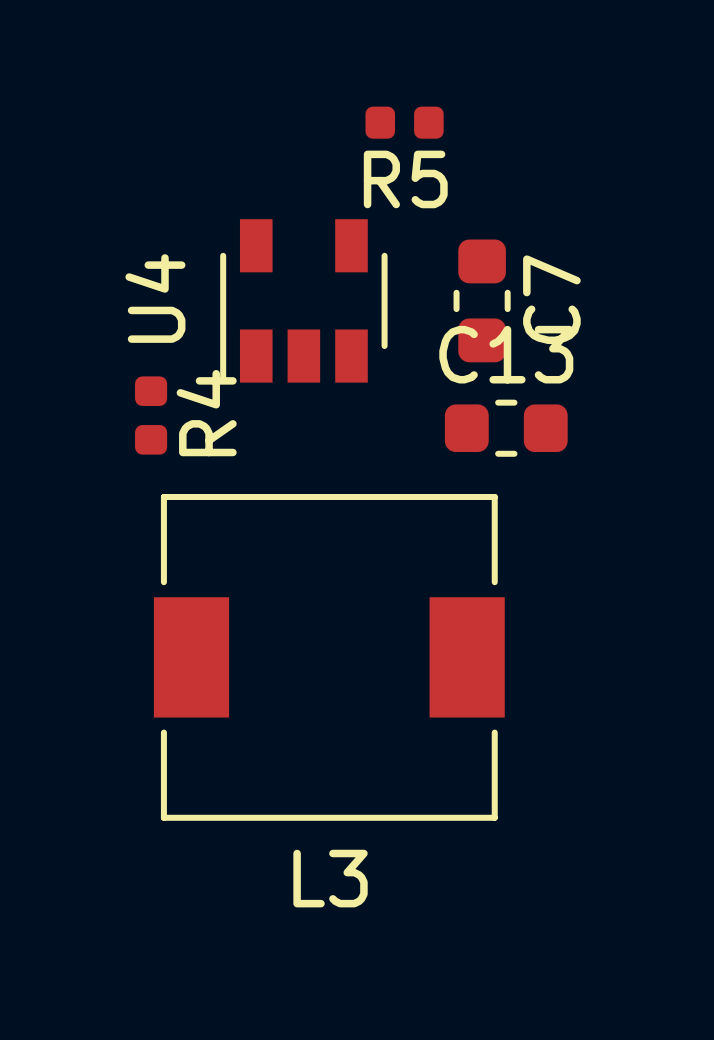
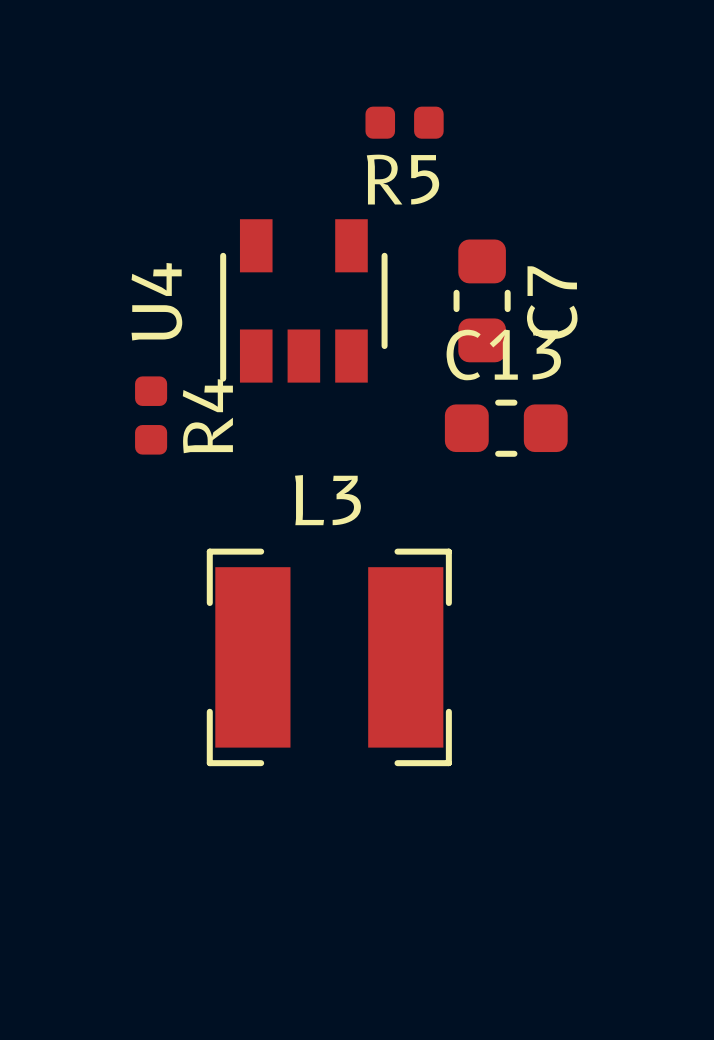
L3 footprint: [153, 493, 505, 821] -> [206, 548, 452, 767]
L3 name position: L3 (330, 878) -> L3 (327, 500)

